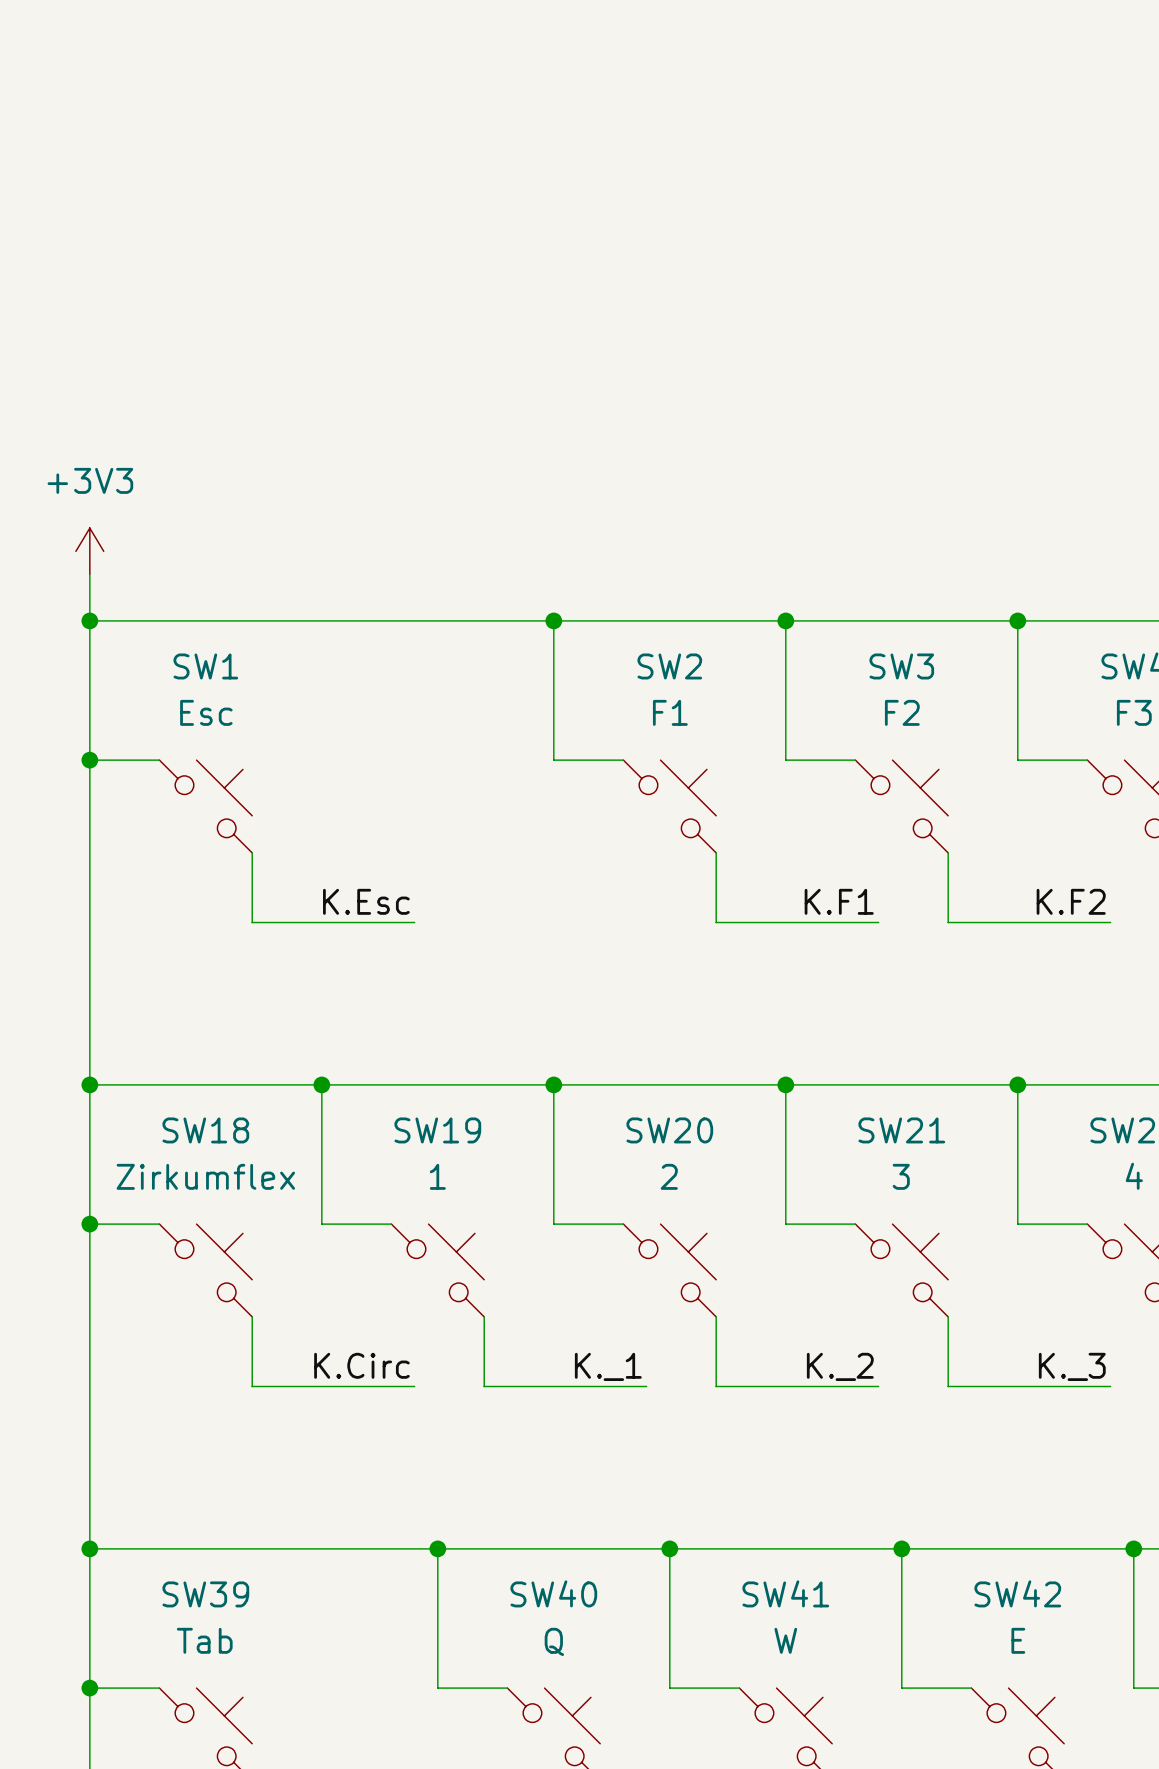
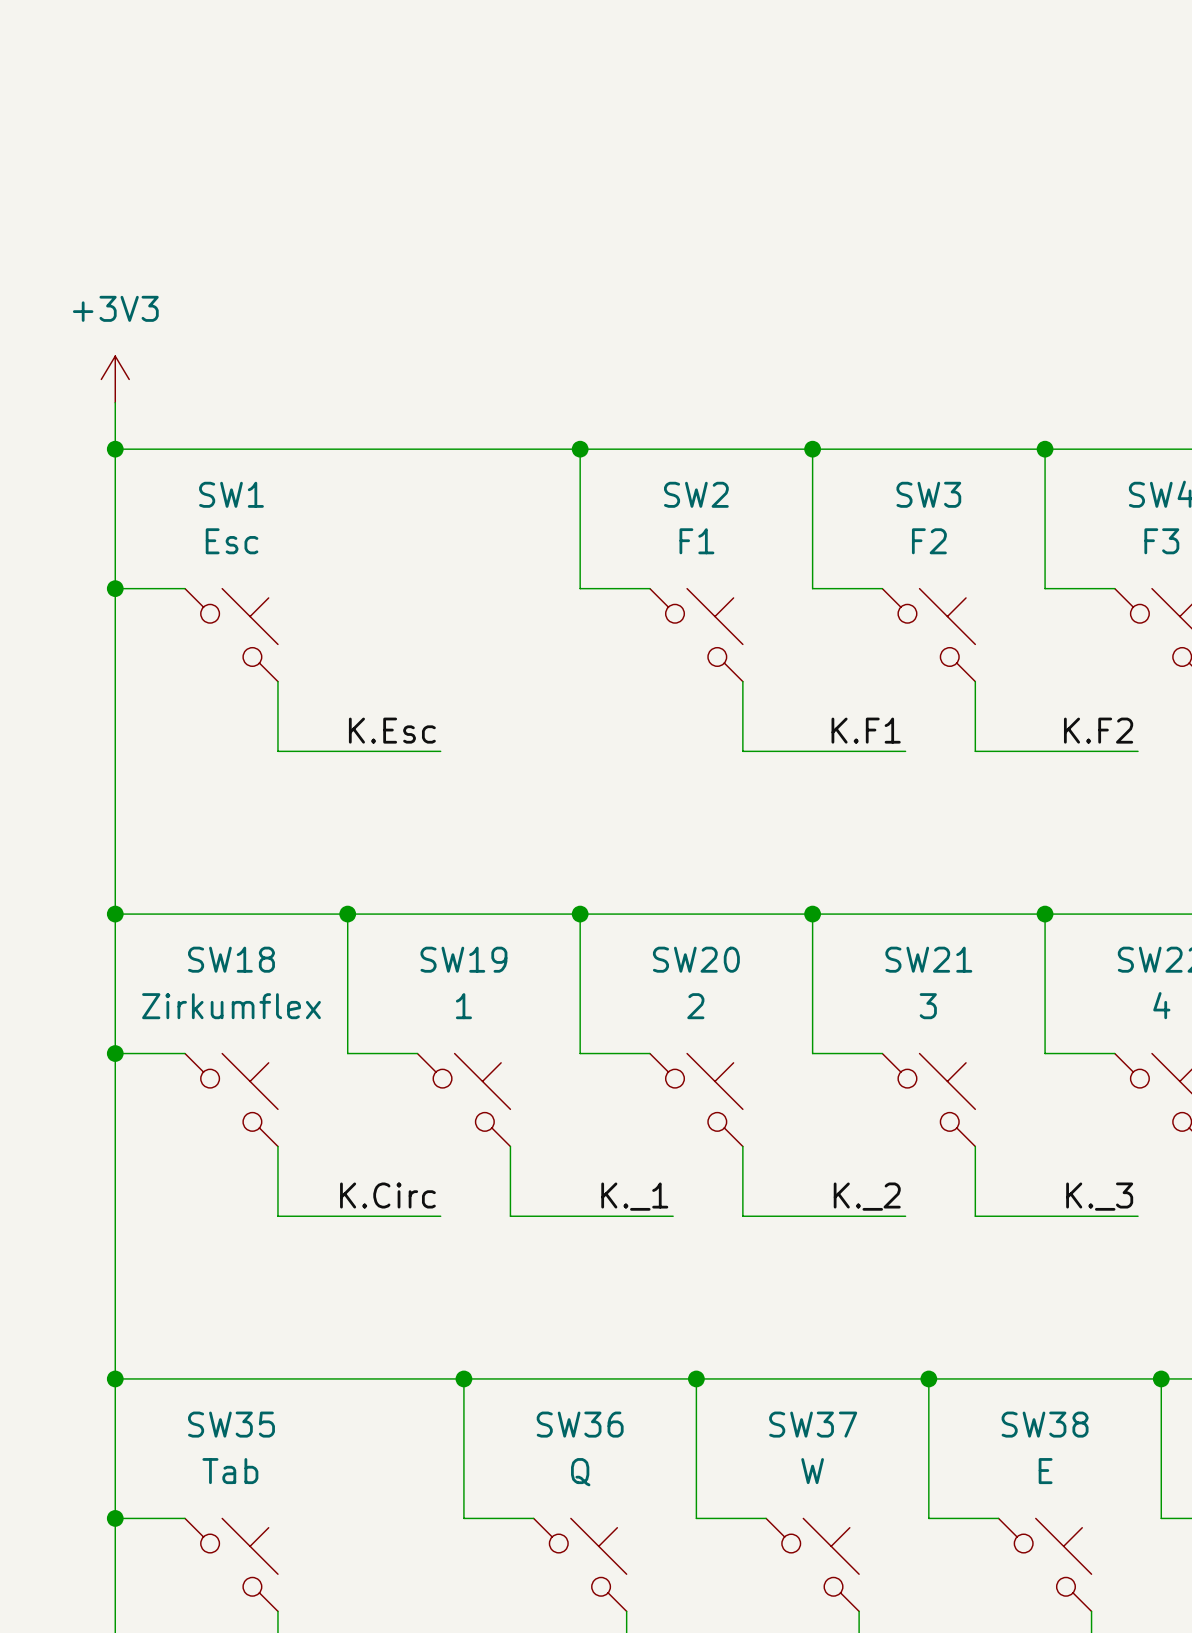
SW40 name: SW40 (553, 1593) -> SW36 (580, 1424)
SW41 name: SW41 (785, 1593) -> SW37 (813, 1424)
SW42 name: SW42 (1017, 1593) -> SW38 (1045, 1424)
SW39 name: SW39 (205, 1594) -> SW35 (231, 1424)

